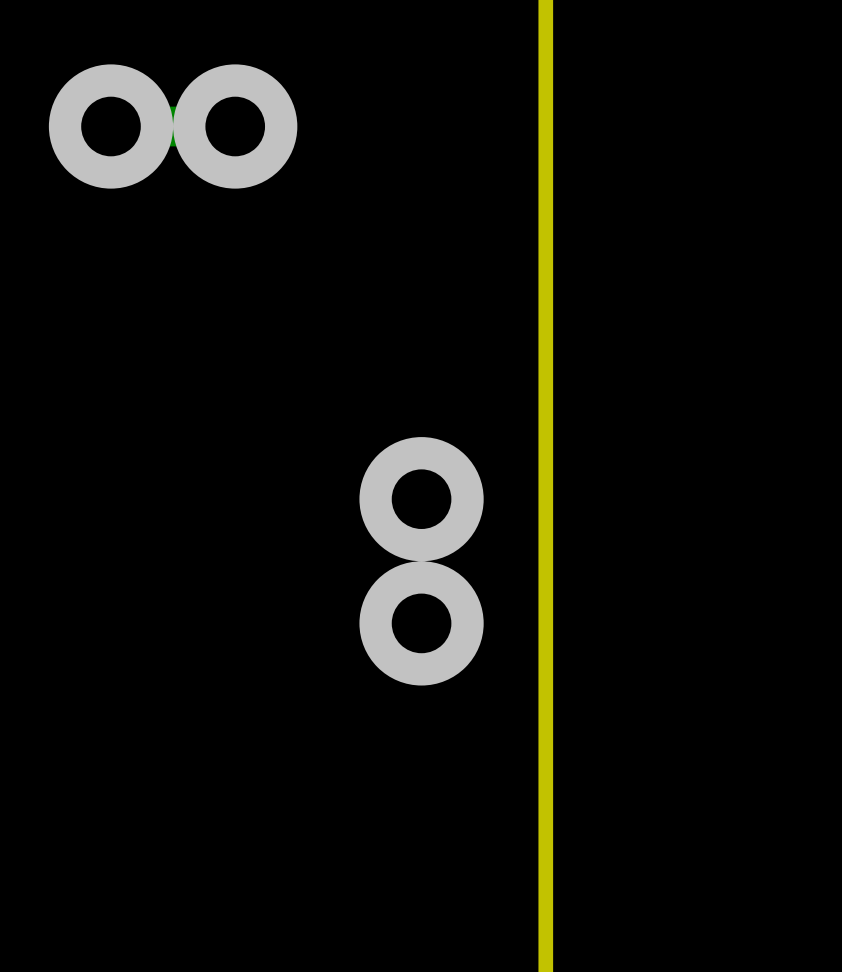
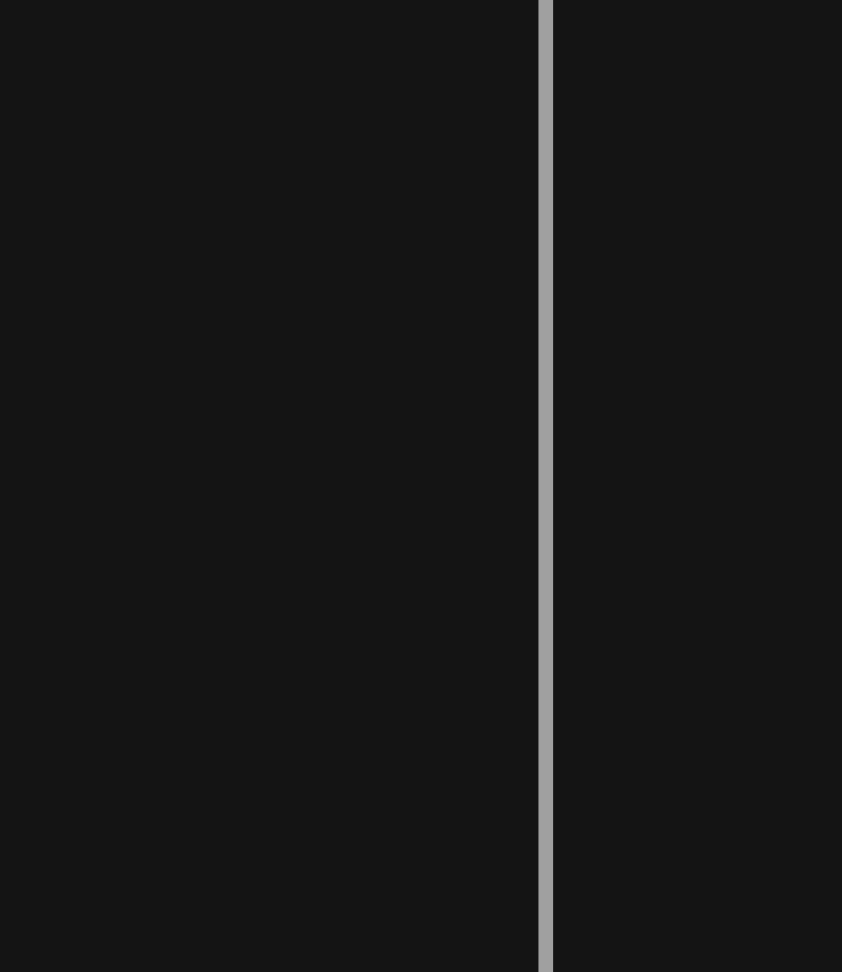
via: (111, 126) -> none
via: (235, 126) -> none
via: (421, 499) -> none
via: (421, 623) -> none

